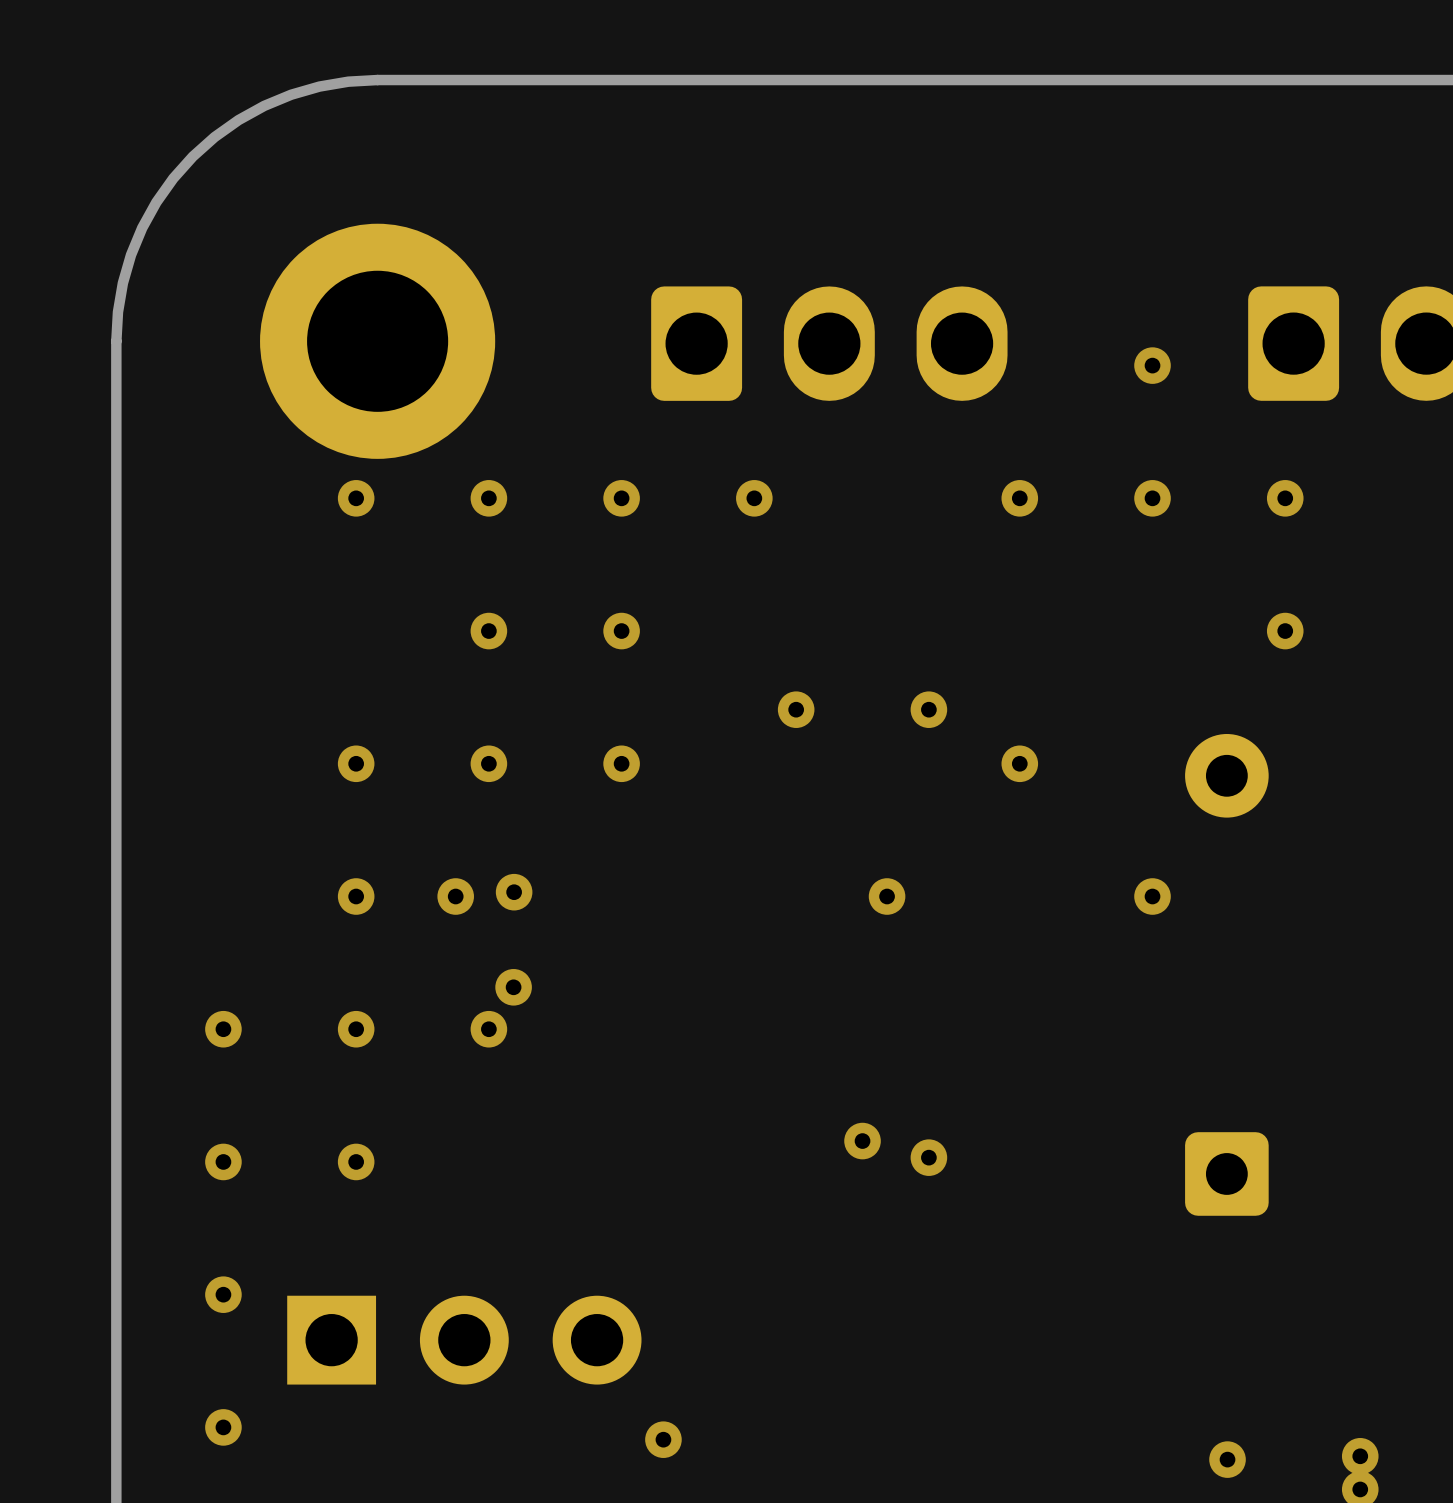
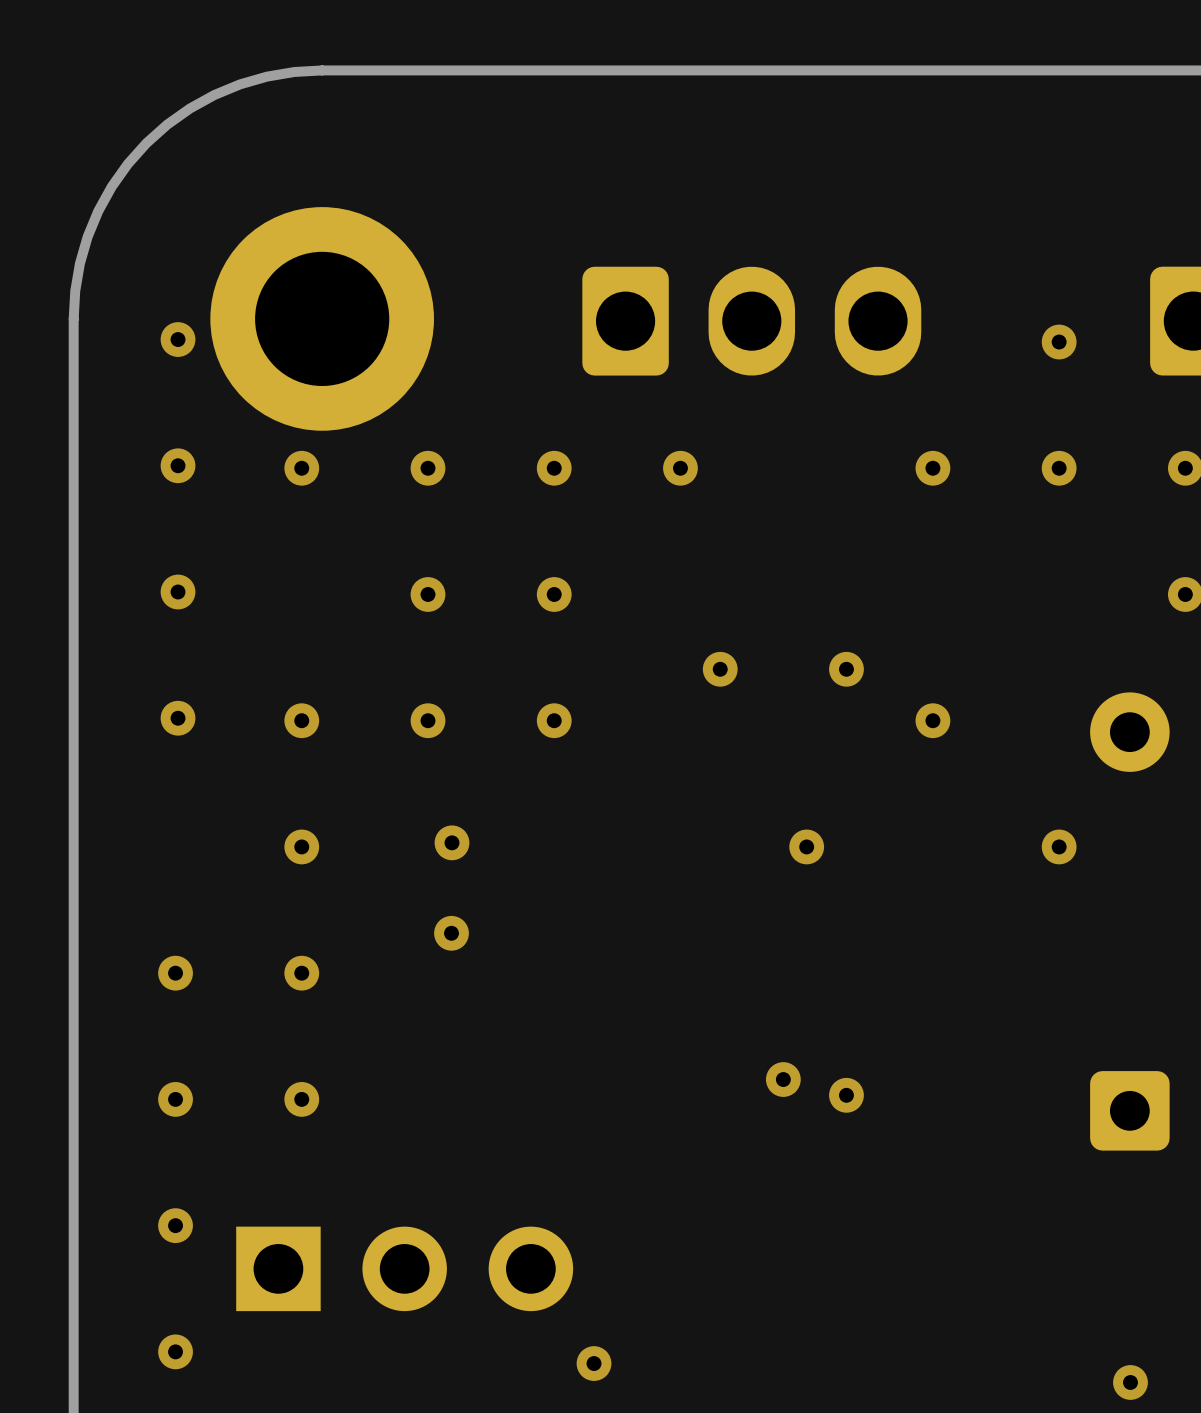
via: none -> (178, 339)
via: none -> (178, 465)
via: none -> (178, 592)
via: none -> (178, 718)
via: (455, 896) -> none
via: (488, 1029) -> none

